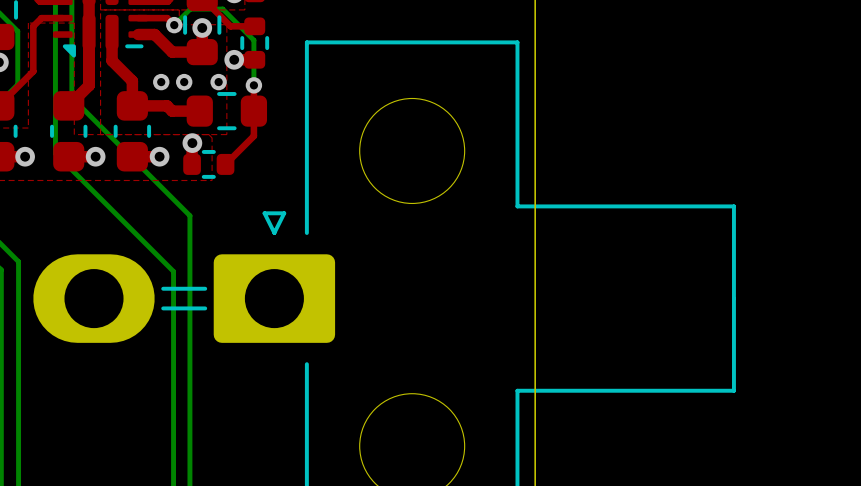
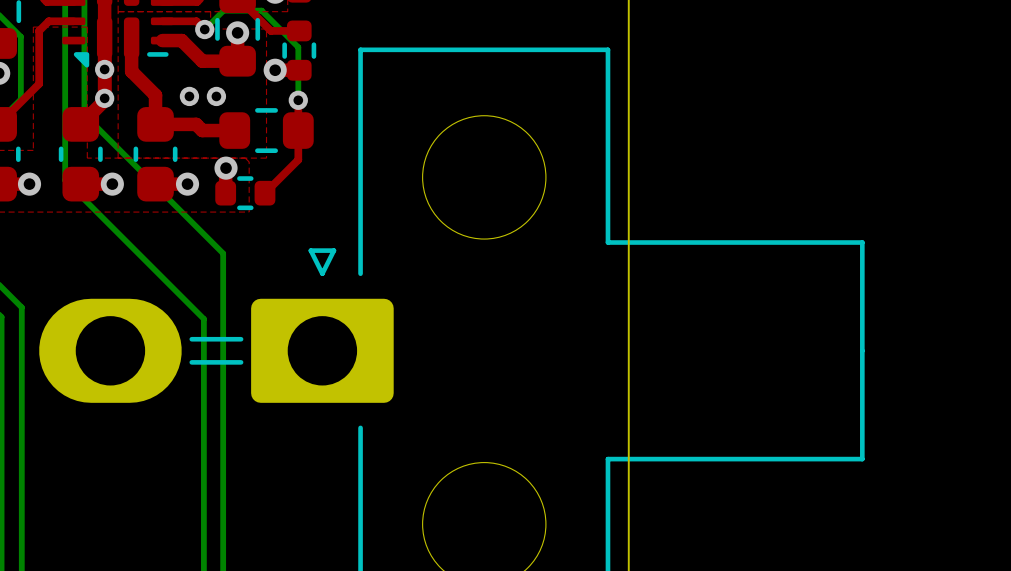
via: none -> (104, 69)
via: (218, 82) -> none
via: none -> (104, 98)

